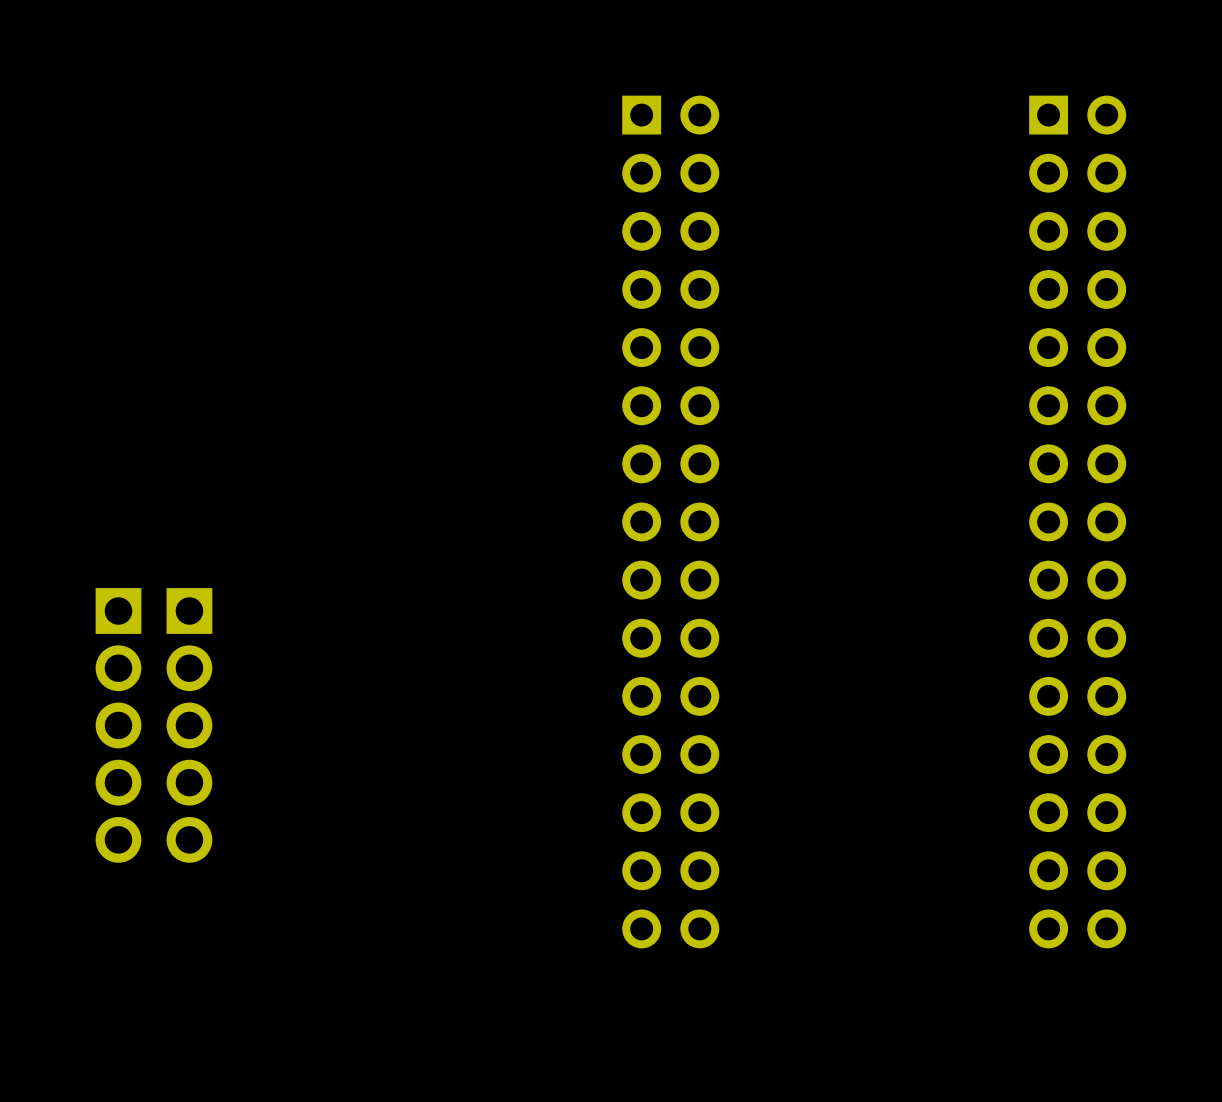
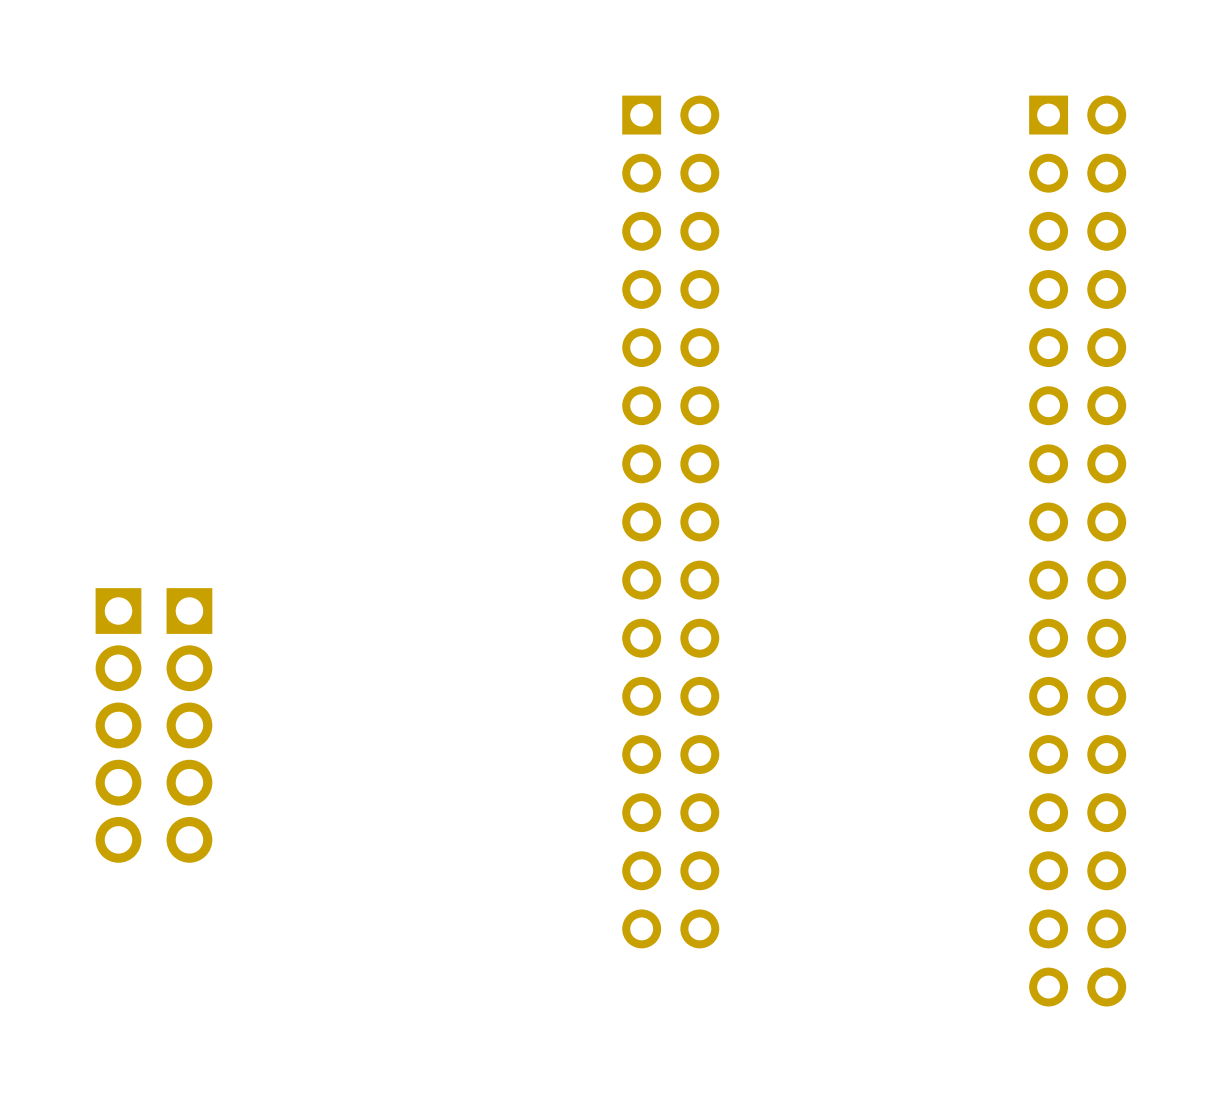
part: none -> (1077, 551)

